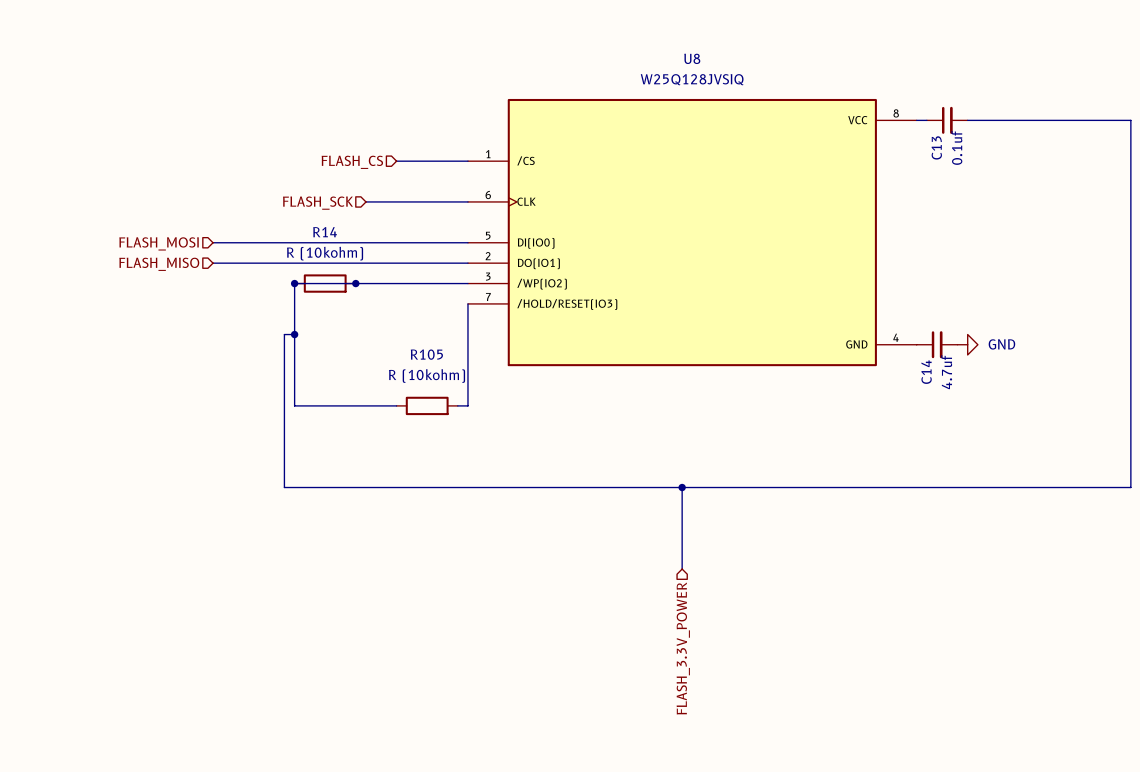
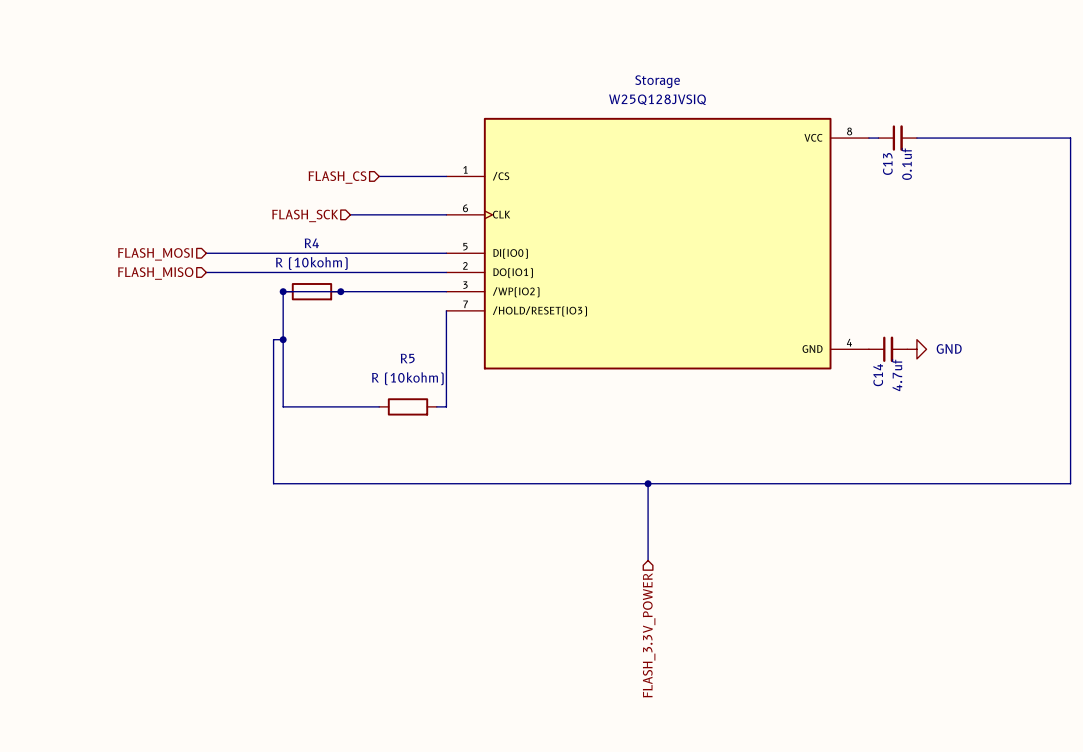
U8 name: U8 (692, 58) -> Storage (657, 81)
R14 name: R14 (325, 232) -> R4 (311, 243)
R105 name: R105 (426, 354) -> R5 (407, 358)

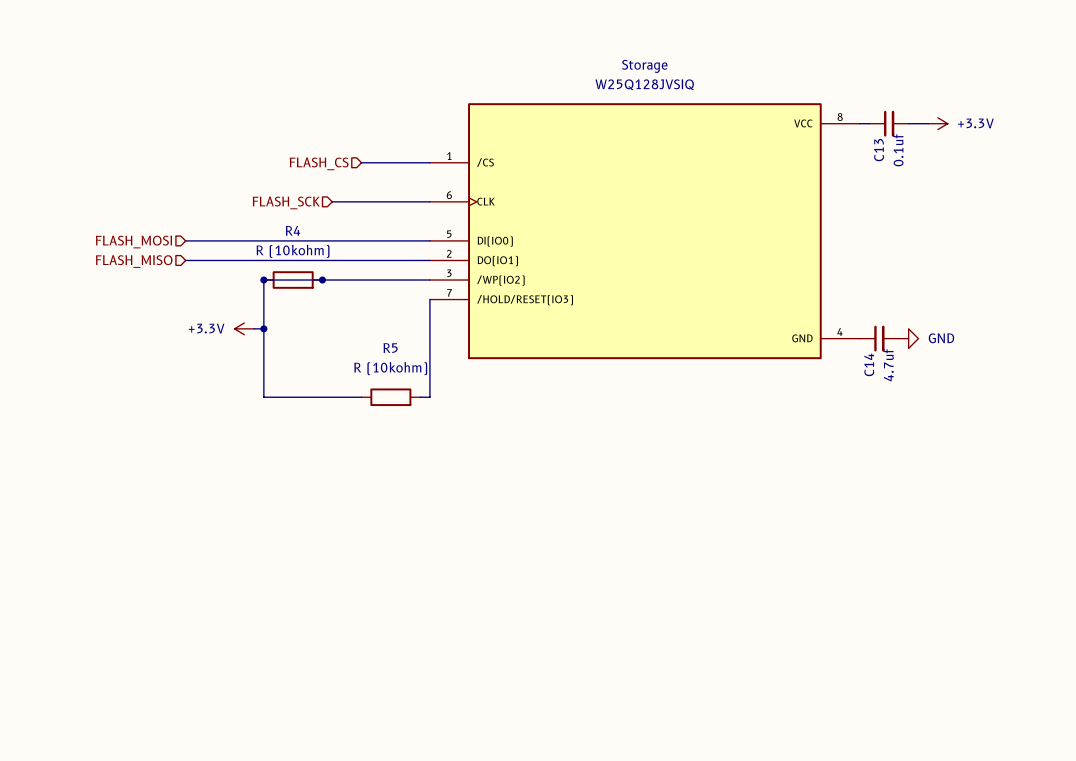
wire: (936, 138) (1070, 138) (1070, 483) (273, 483) (273, 339) -> none
power symbol: none -> +3.3V (937, 123)
power symbol: none -> +3.3V (244, 328)
wire: (648, 483) (648, 560) -> none
junction: (648, 483) -> none
hierarchical label: FLASH_3.3V_POWER (649, 635) -> none

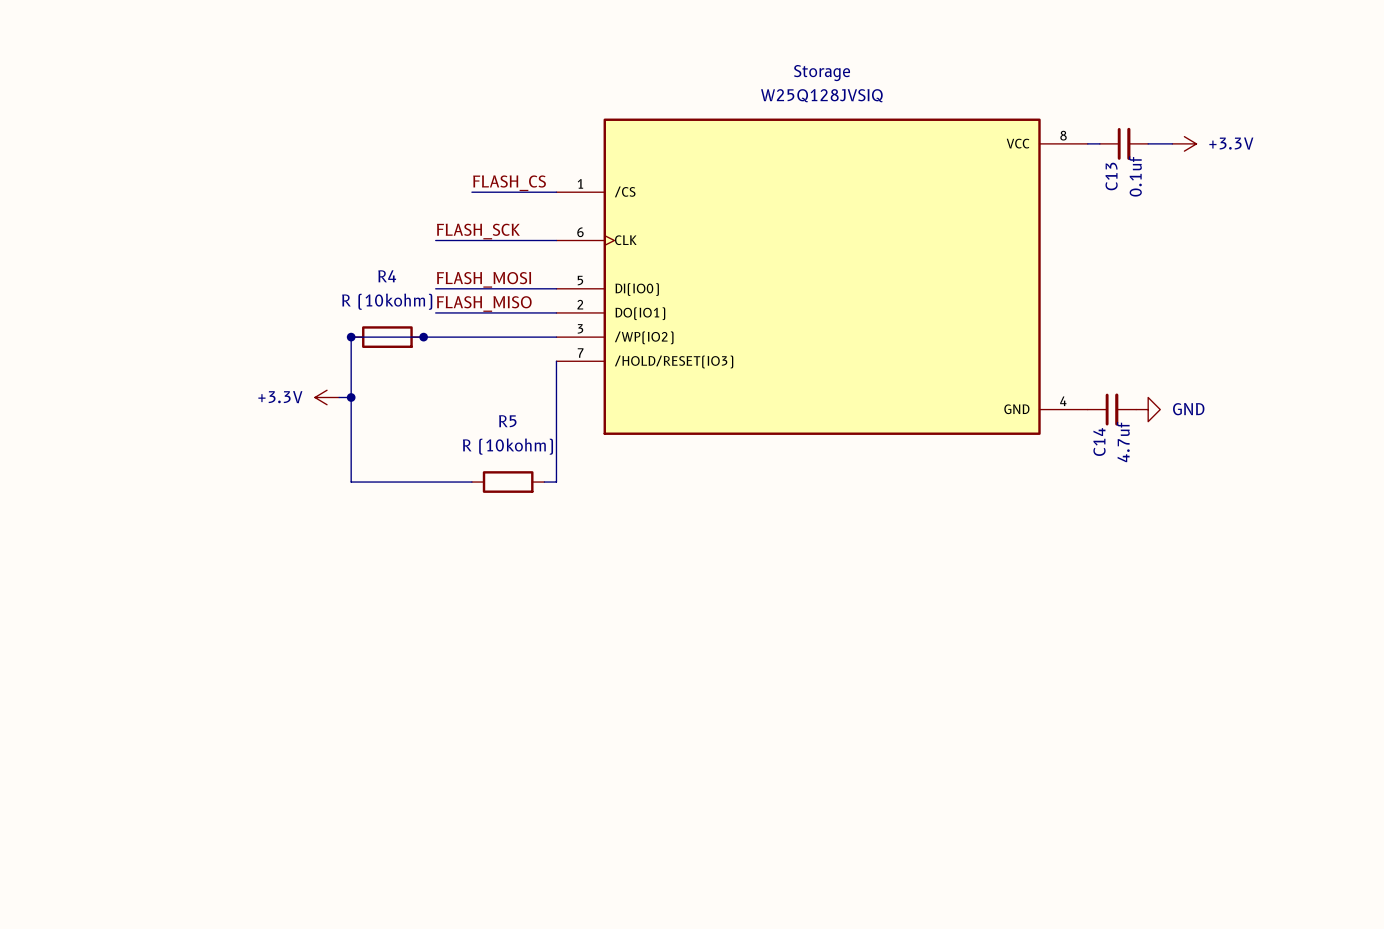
label: none -> FLASH_CS (509, 183)
hierarchical label: FLASH_CS (319, 163) -> none
label: none -> FLASH_SCK (478, 231)
hierarchical label: FLASH_SCK (286, 202) -> none
label: none -> FLASH_MOSI (484, 279)
wire: (185, 240) (332, 240) -> none
hierarchical label: FLASH_MOSI (133, 242) -> none
label: none -> FLASH_MISO (484, 303)
wire: (185, 260) (332, 260) -> none
hierarchical label: FLASH_MISO (134, 261) -> none

